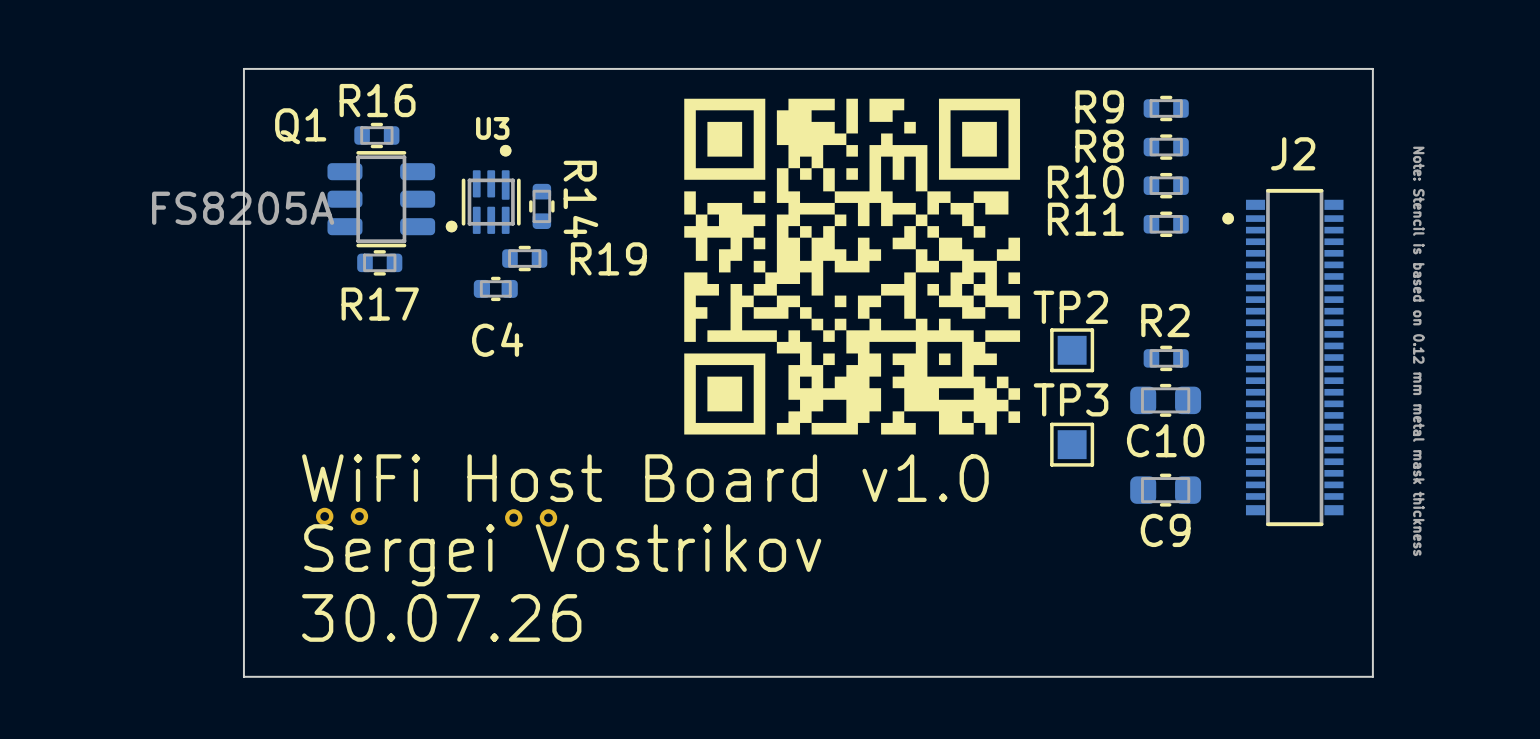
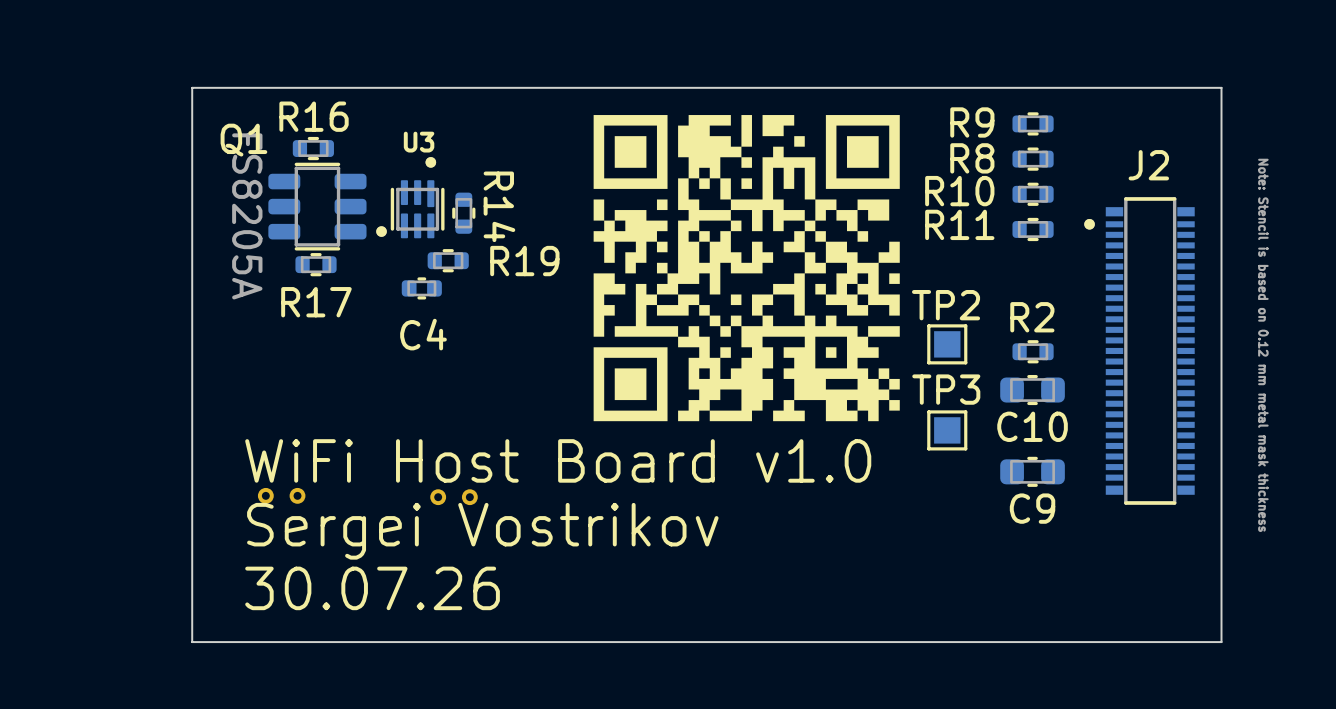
Q1 value rotation: 0° (243, 208) -> 90° clockwise (247, 216)

